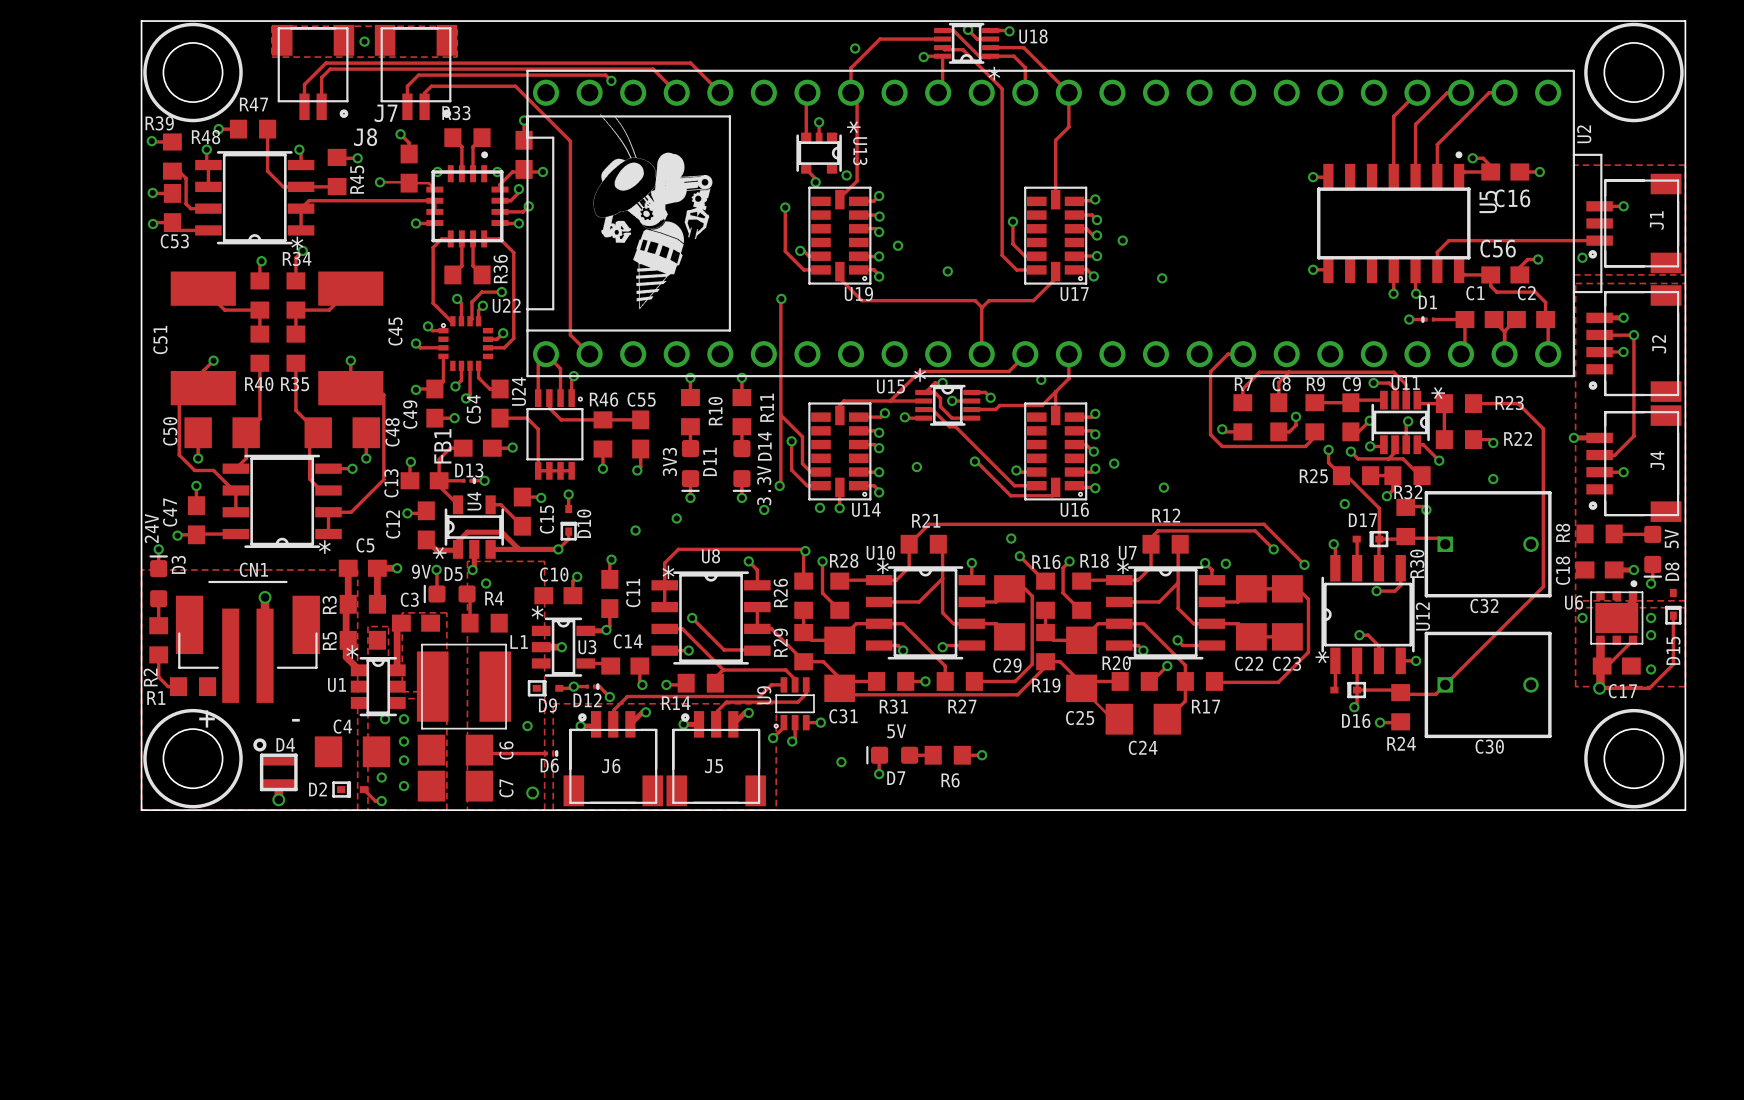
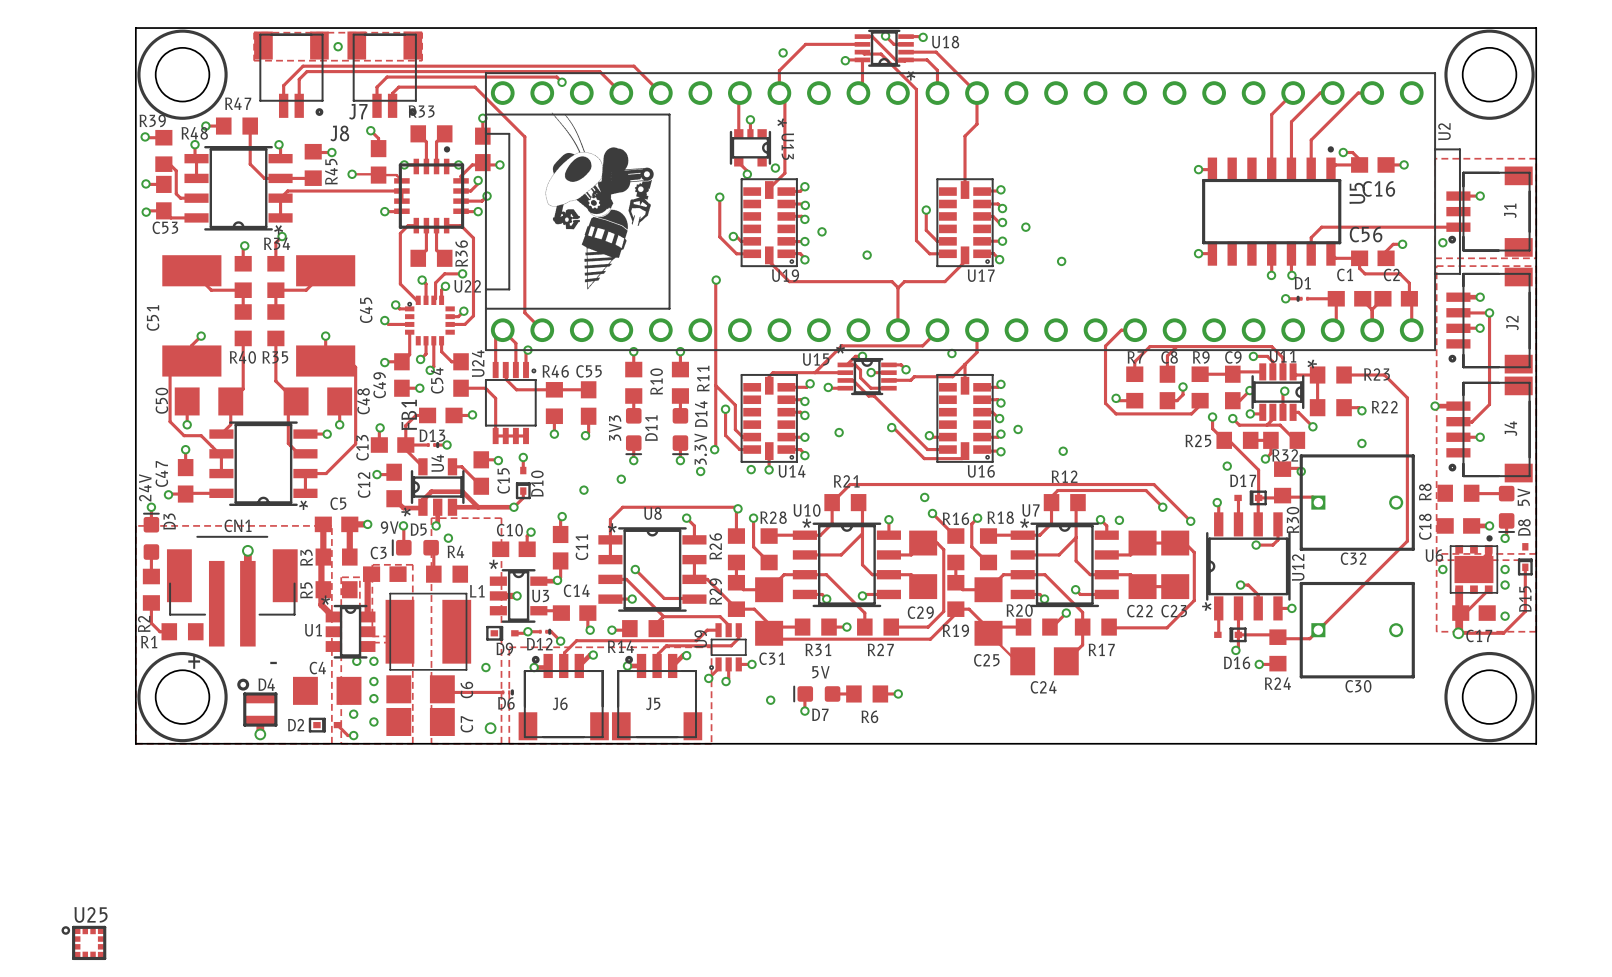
U25: none -> (83, 942)

